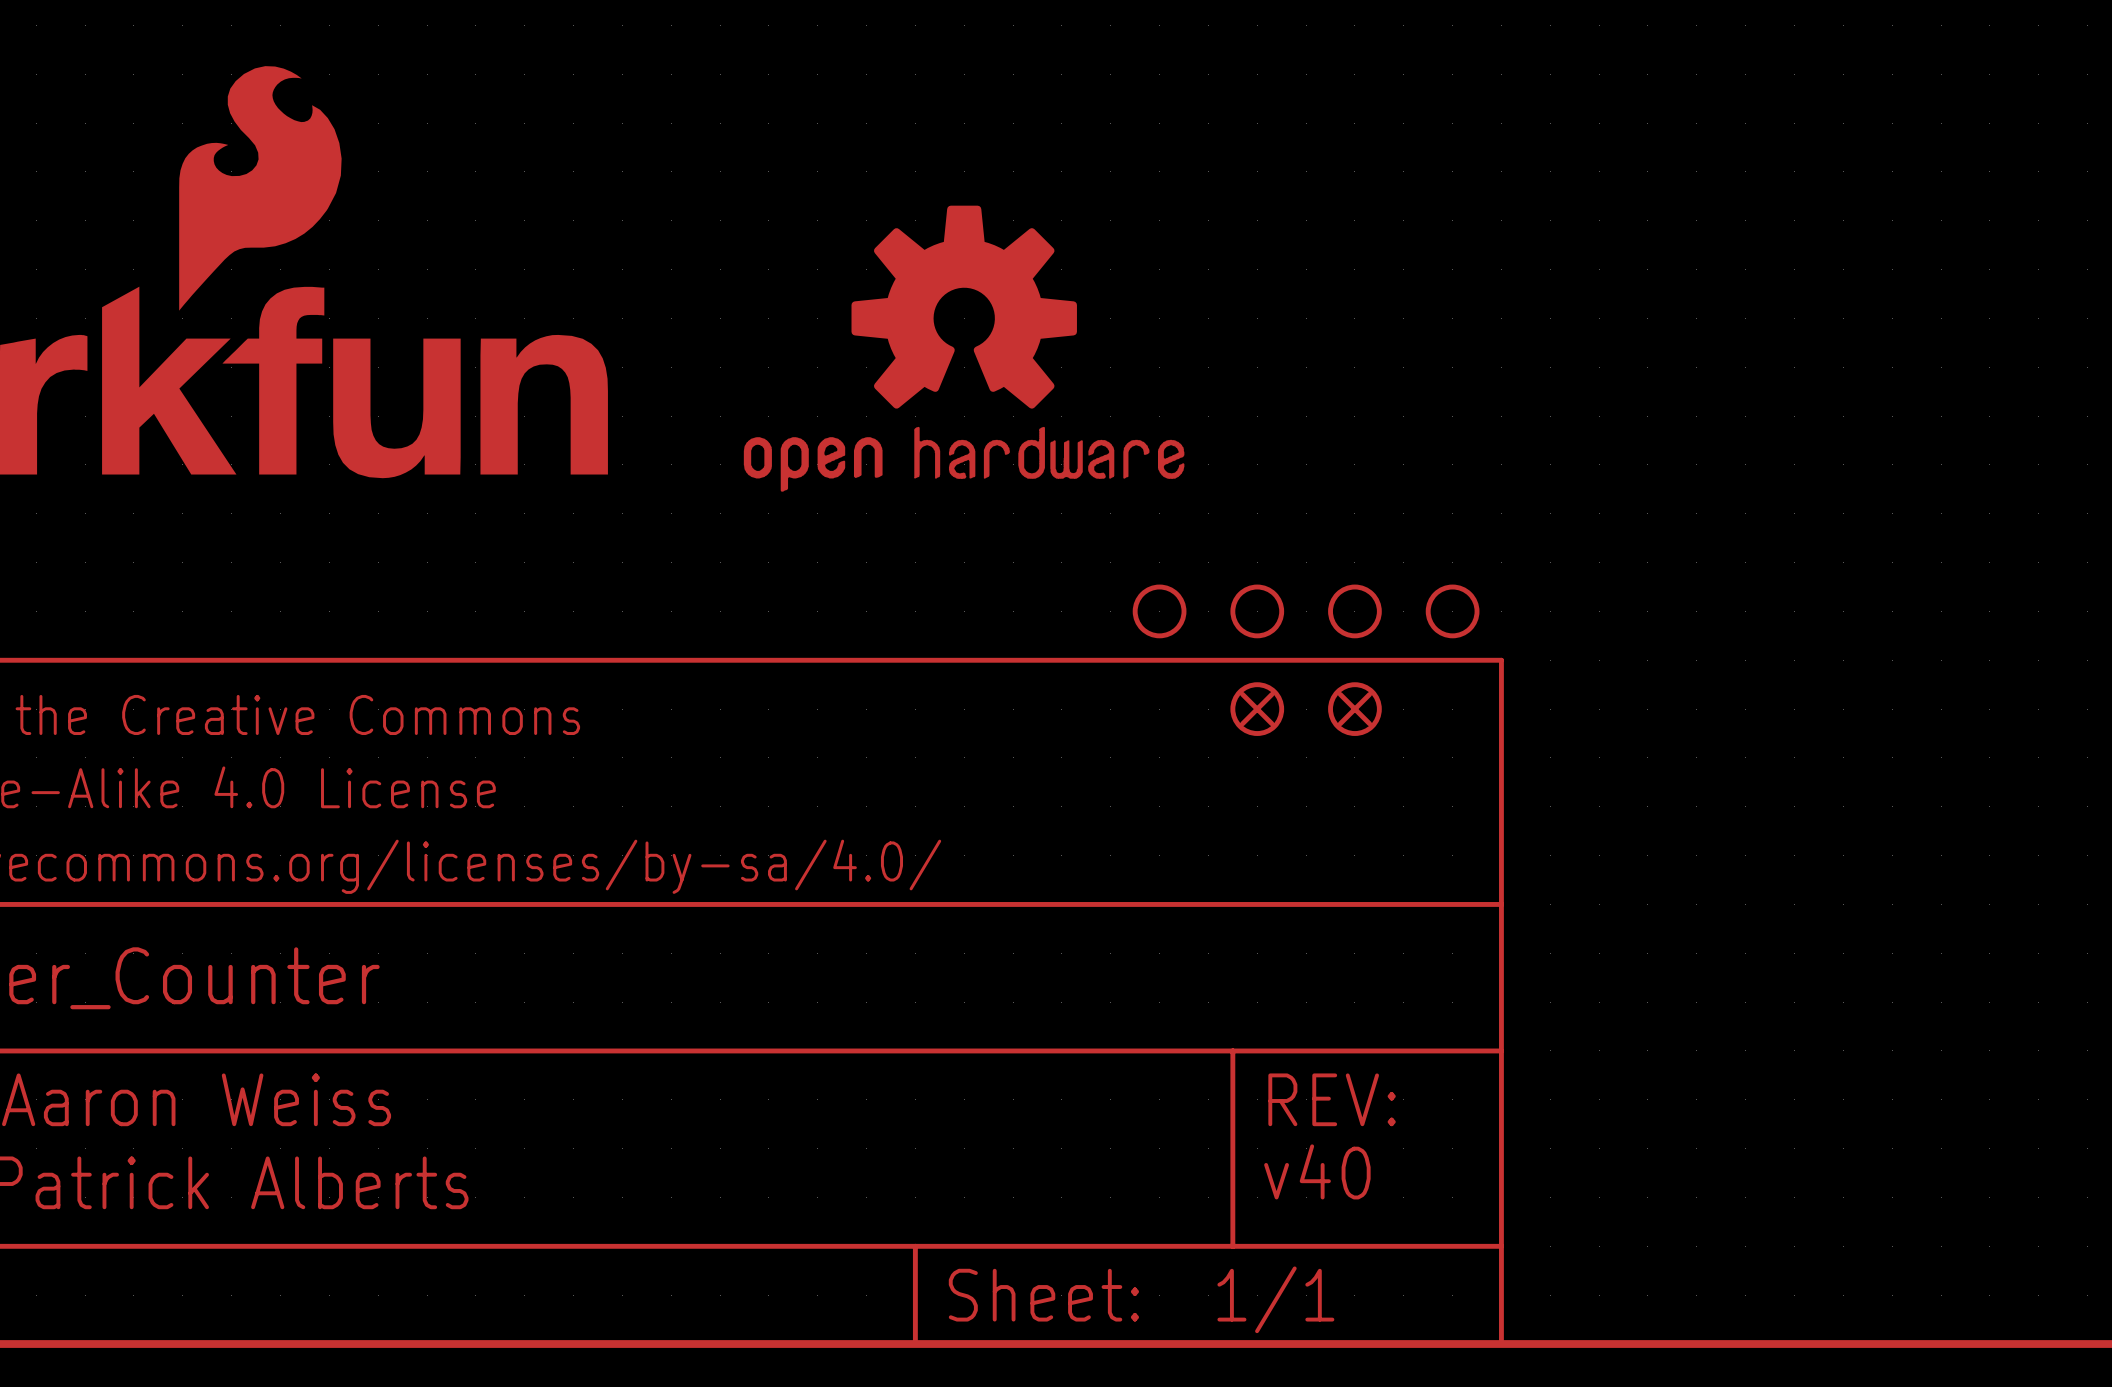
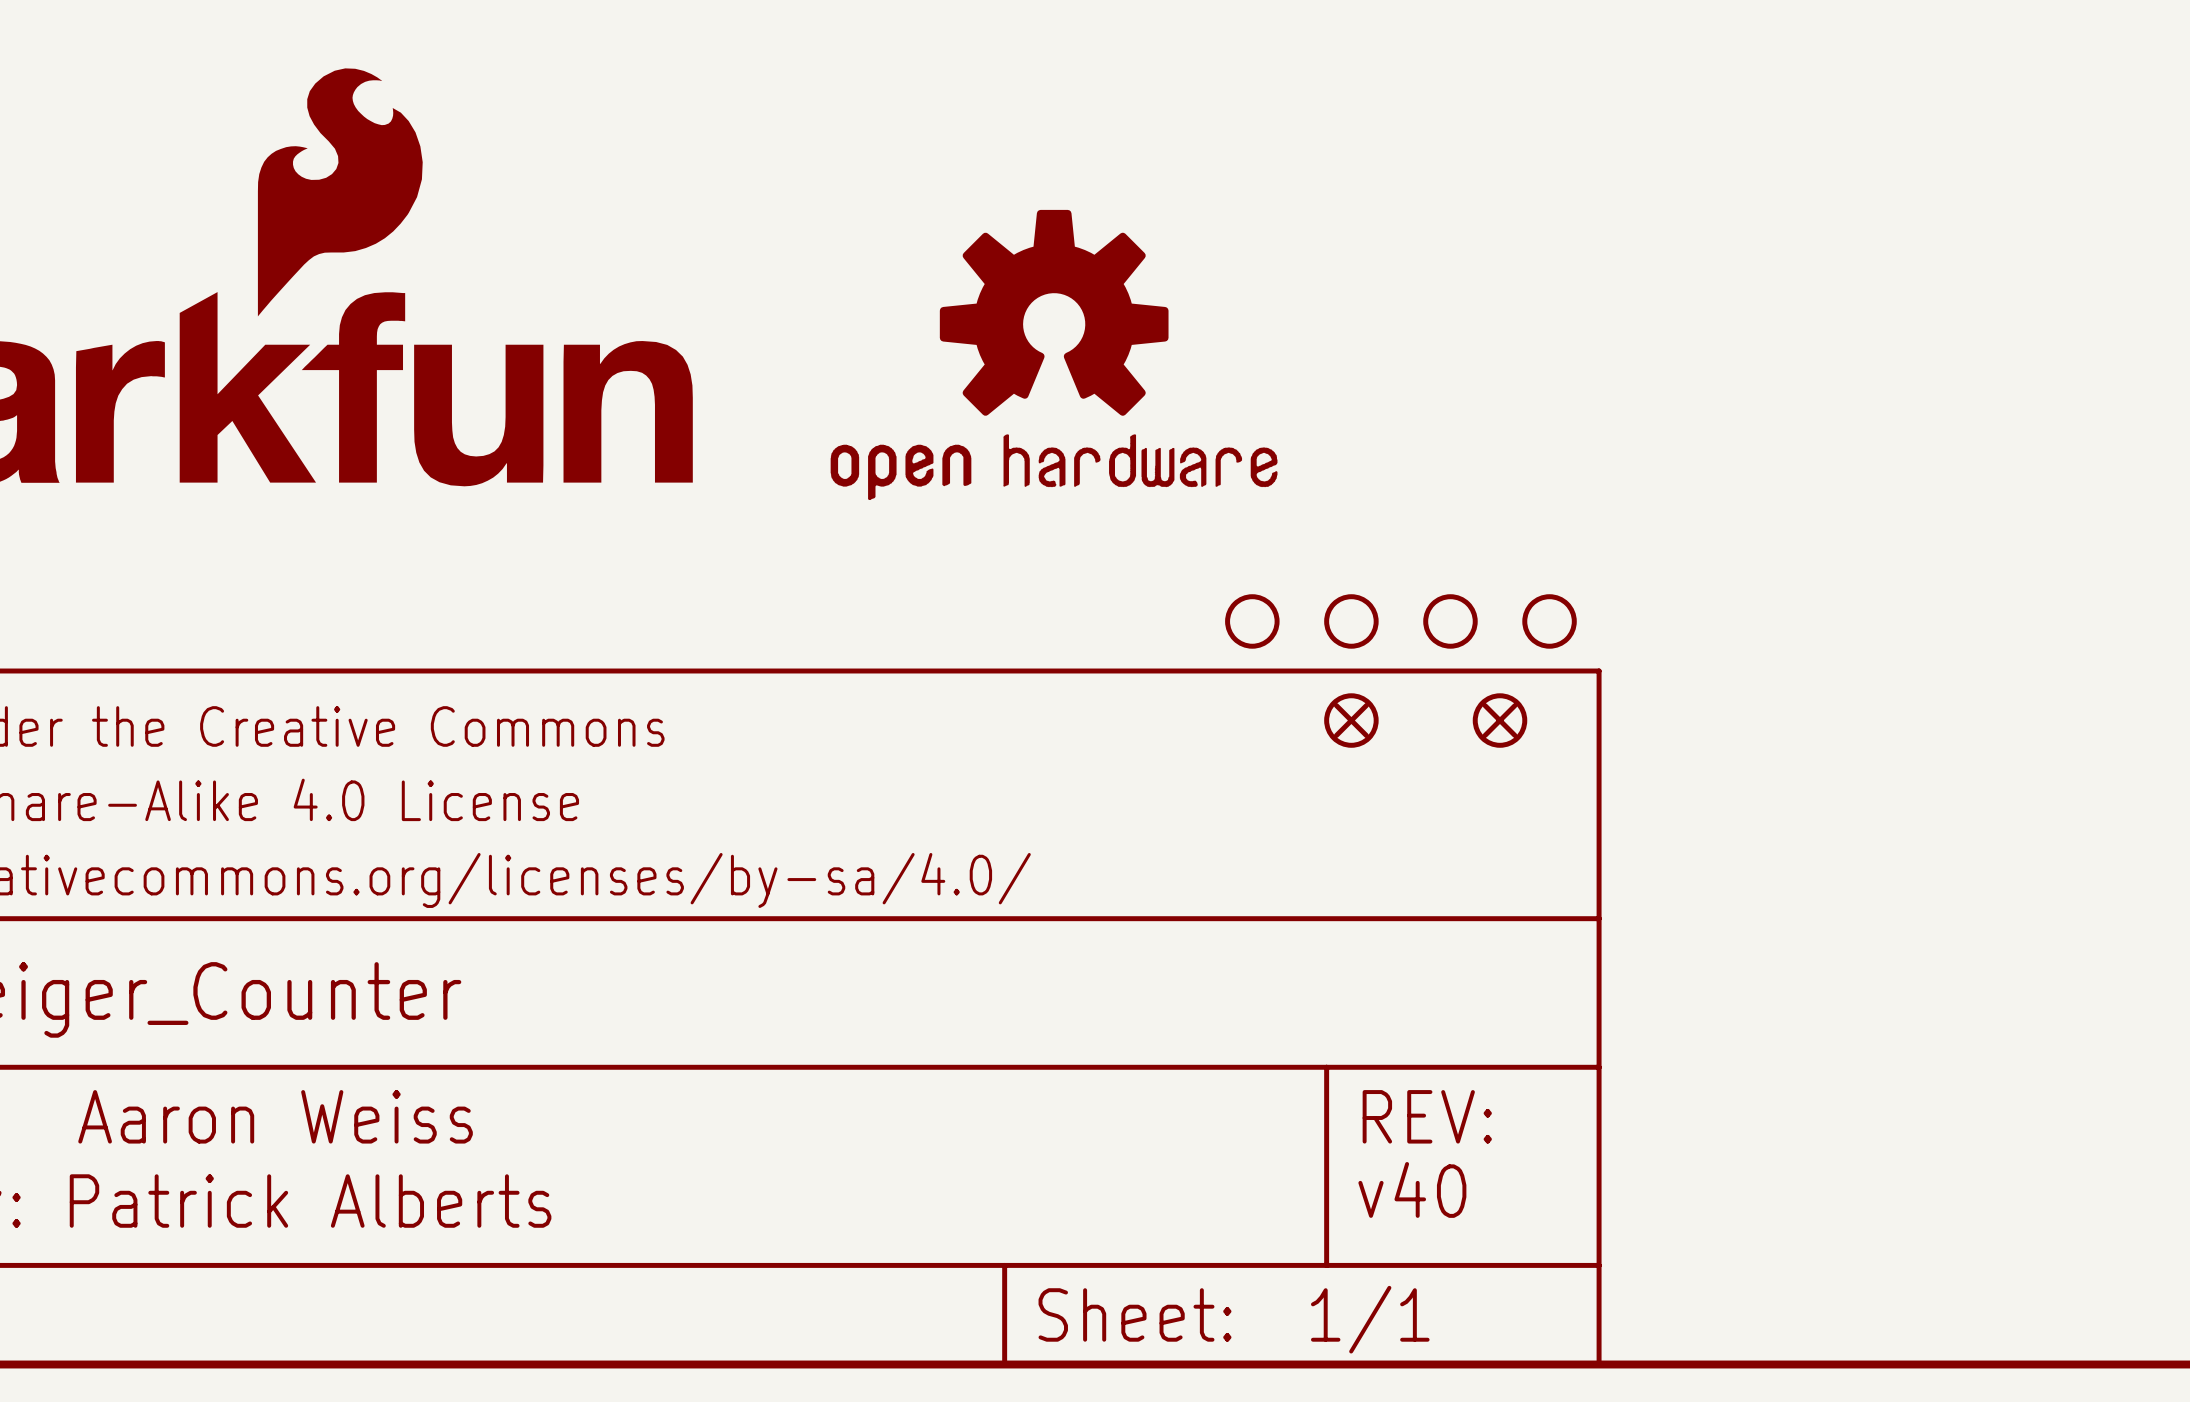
part position: (1354, 709) -> (1500, 720)

